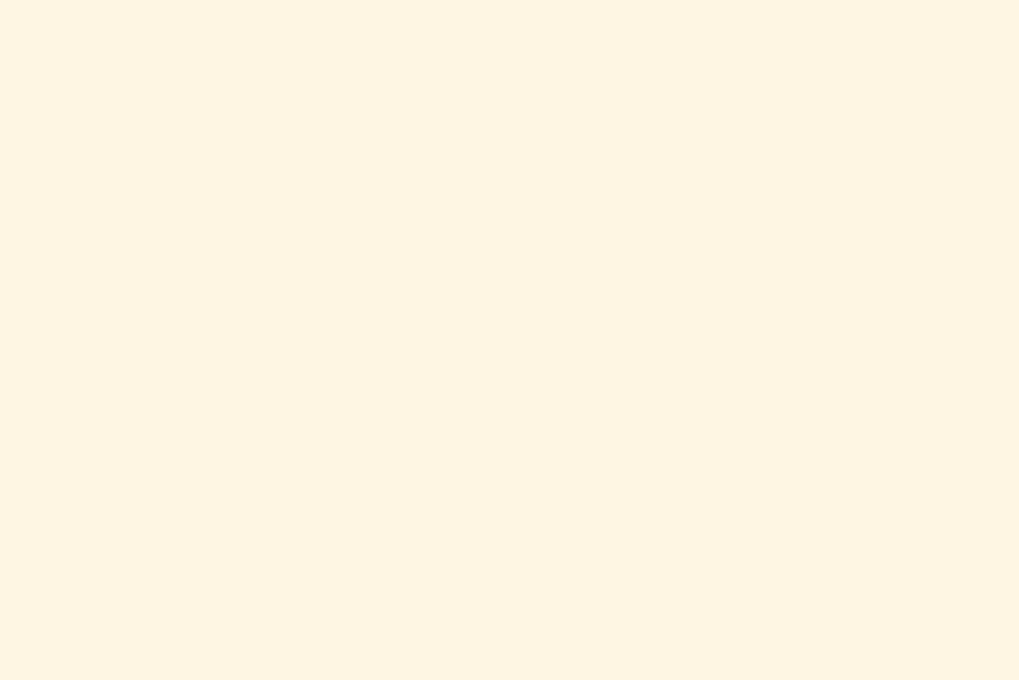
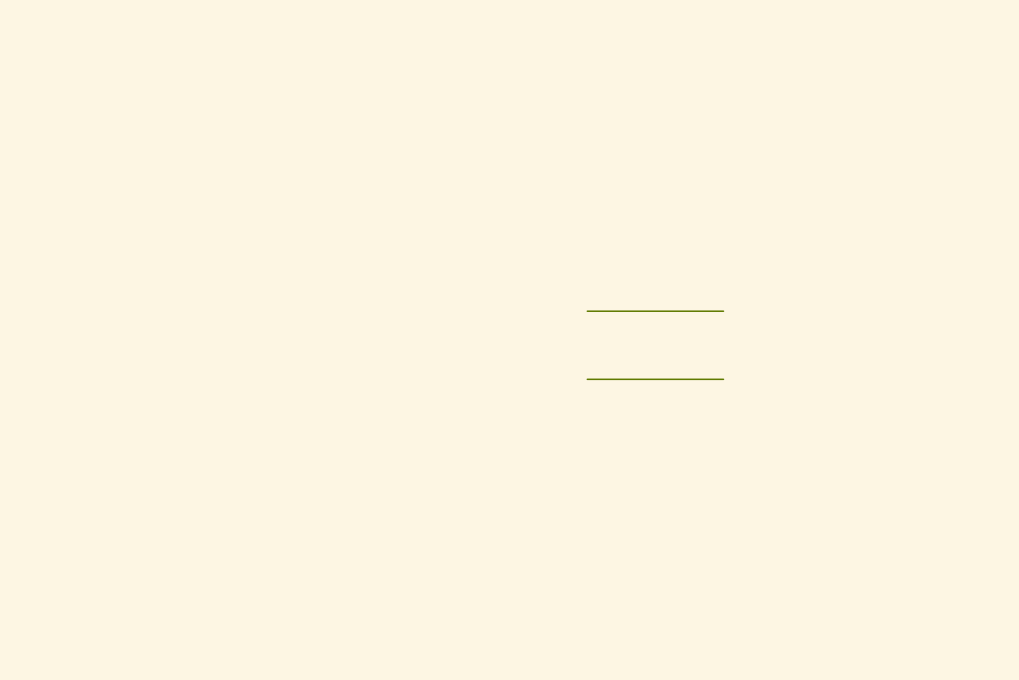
wire: none -> (587, 311) (723, 311)
wire: none -> (587, 379) (723, 379)

